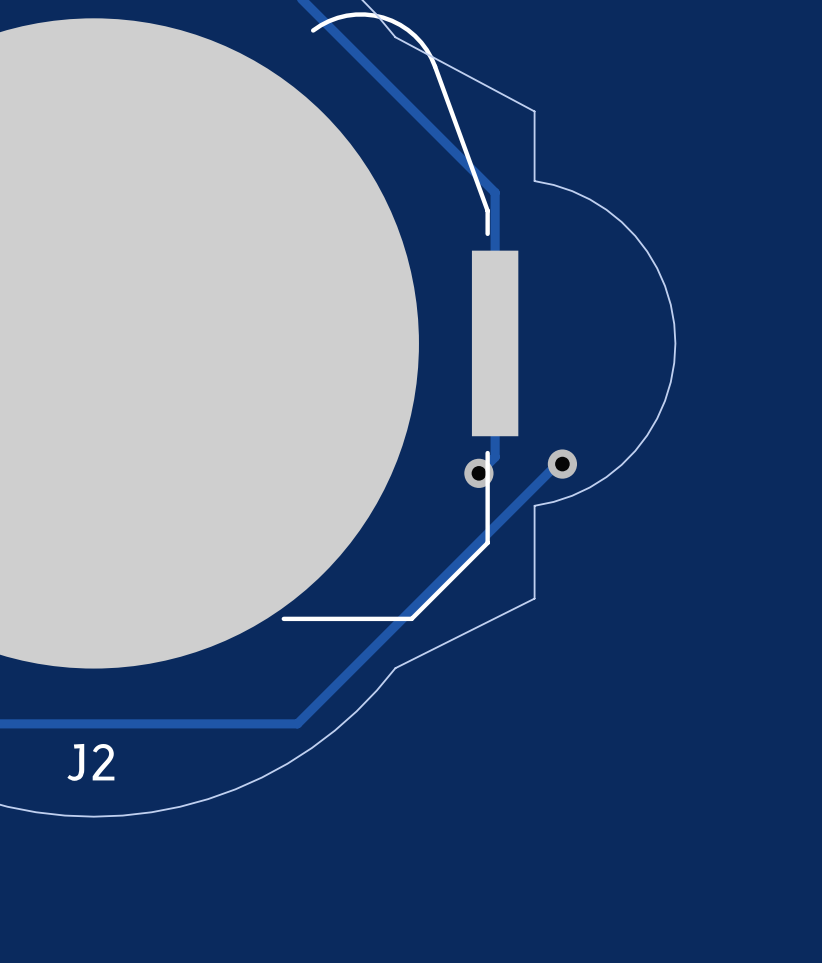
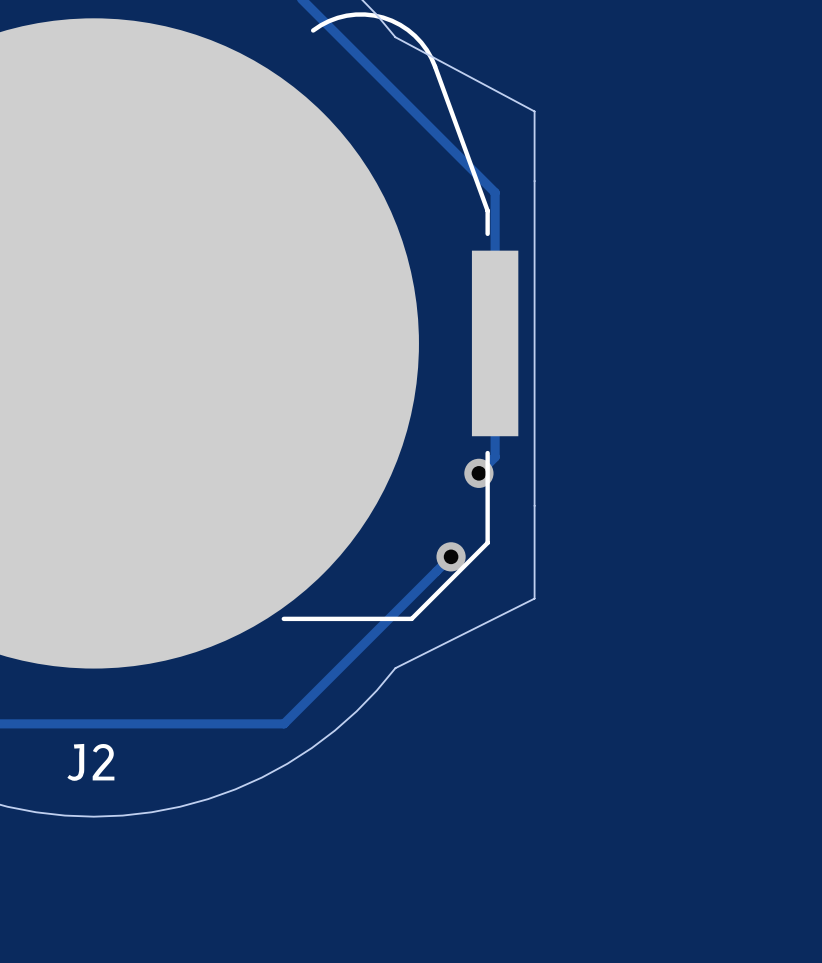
board edge: (534, 181) (553, 184) (589, 199) (606, 209) (635, 235) (647, 251) (665, 286) (670, 304) (675, 343) (674, 362) (665, 400) (657, 418) (635, 450) (606, 477) (589, 487) (553, 501) (534, 505) -> (534, 181) (534, 505)
track: (562, 464) (557, 464) (297, 723) (284, 723) -> (451, 556) (284, 723)
via position: (562, 464) -> (451, 556)

